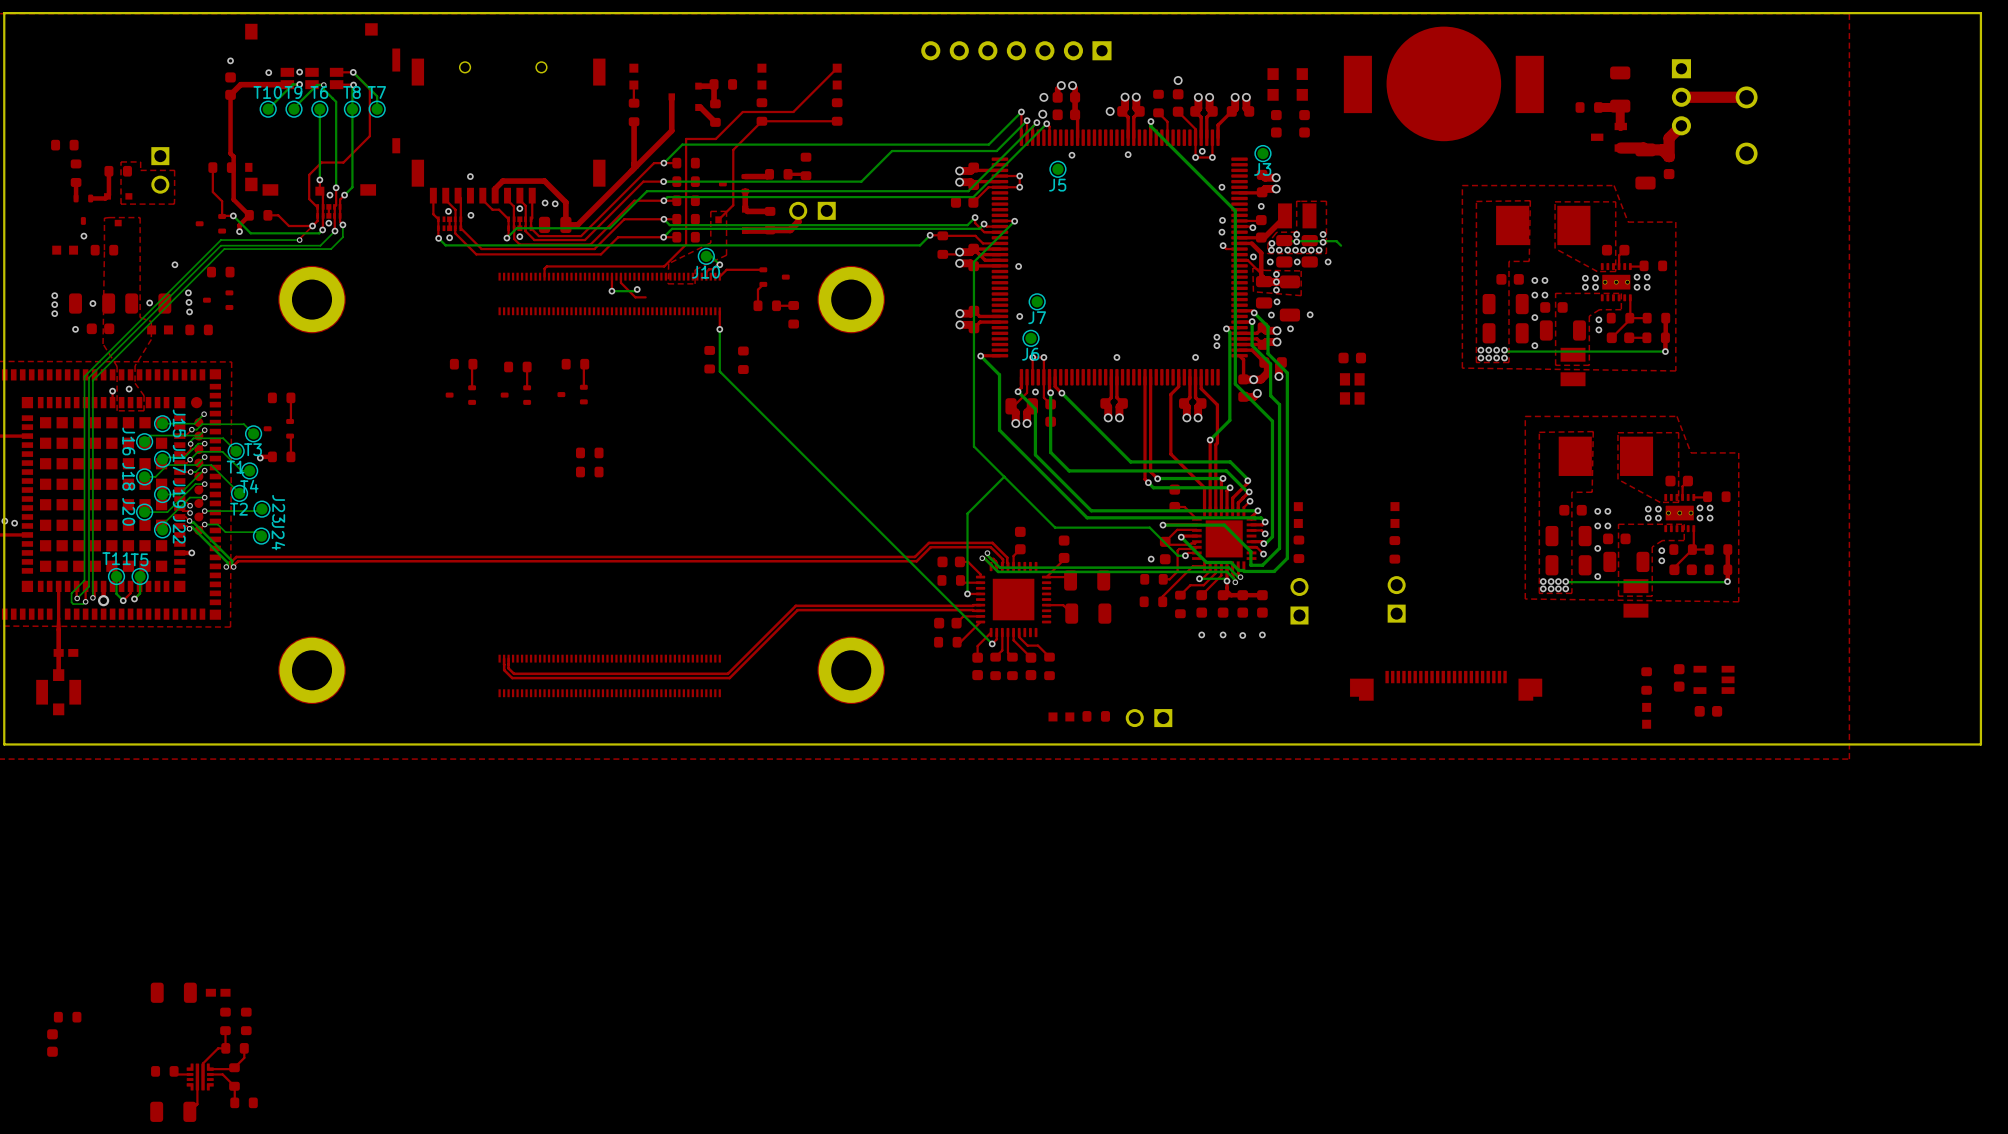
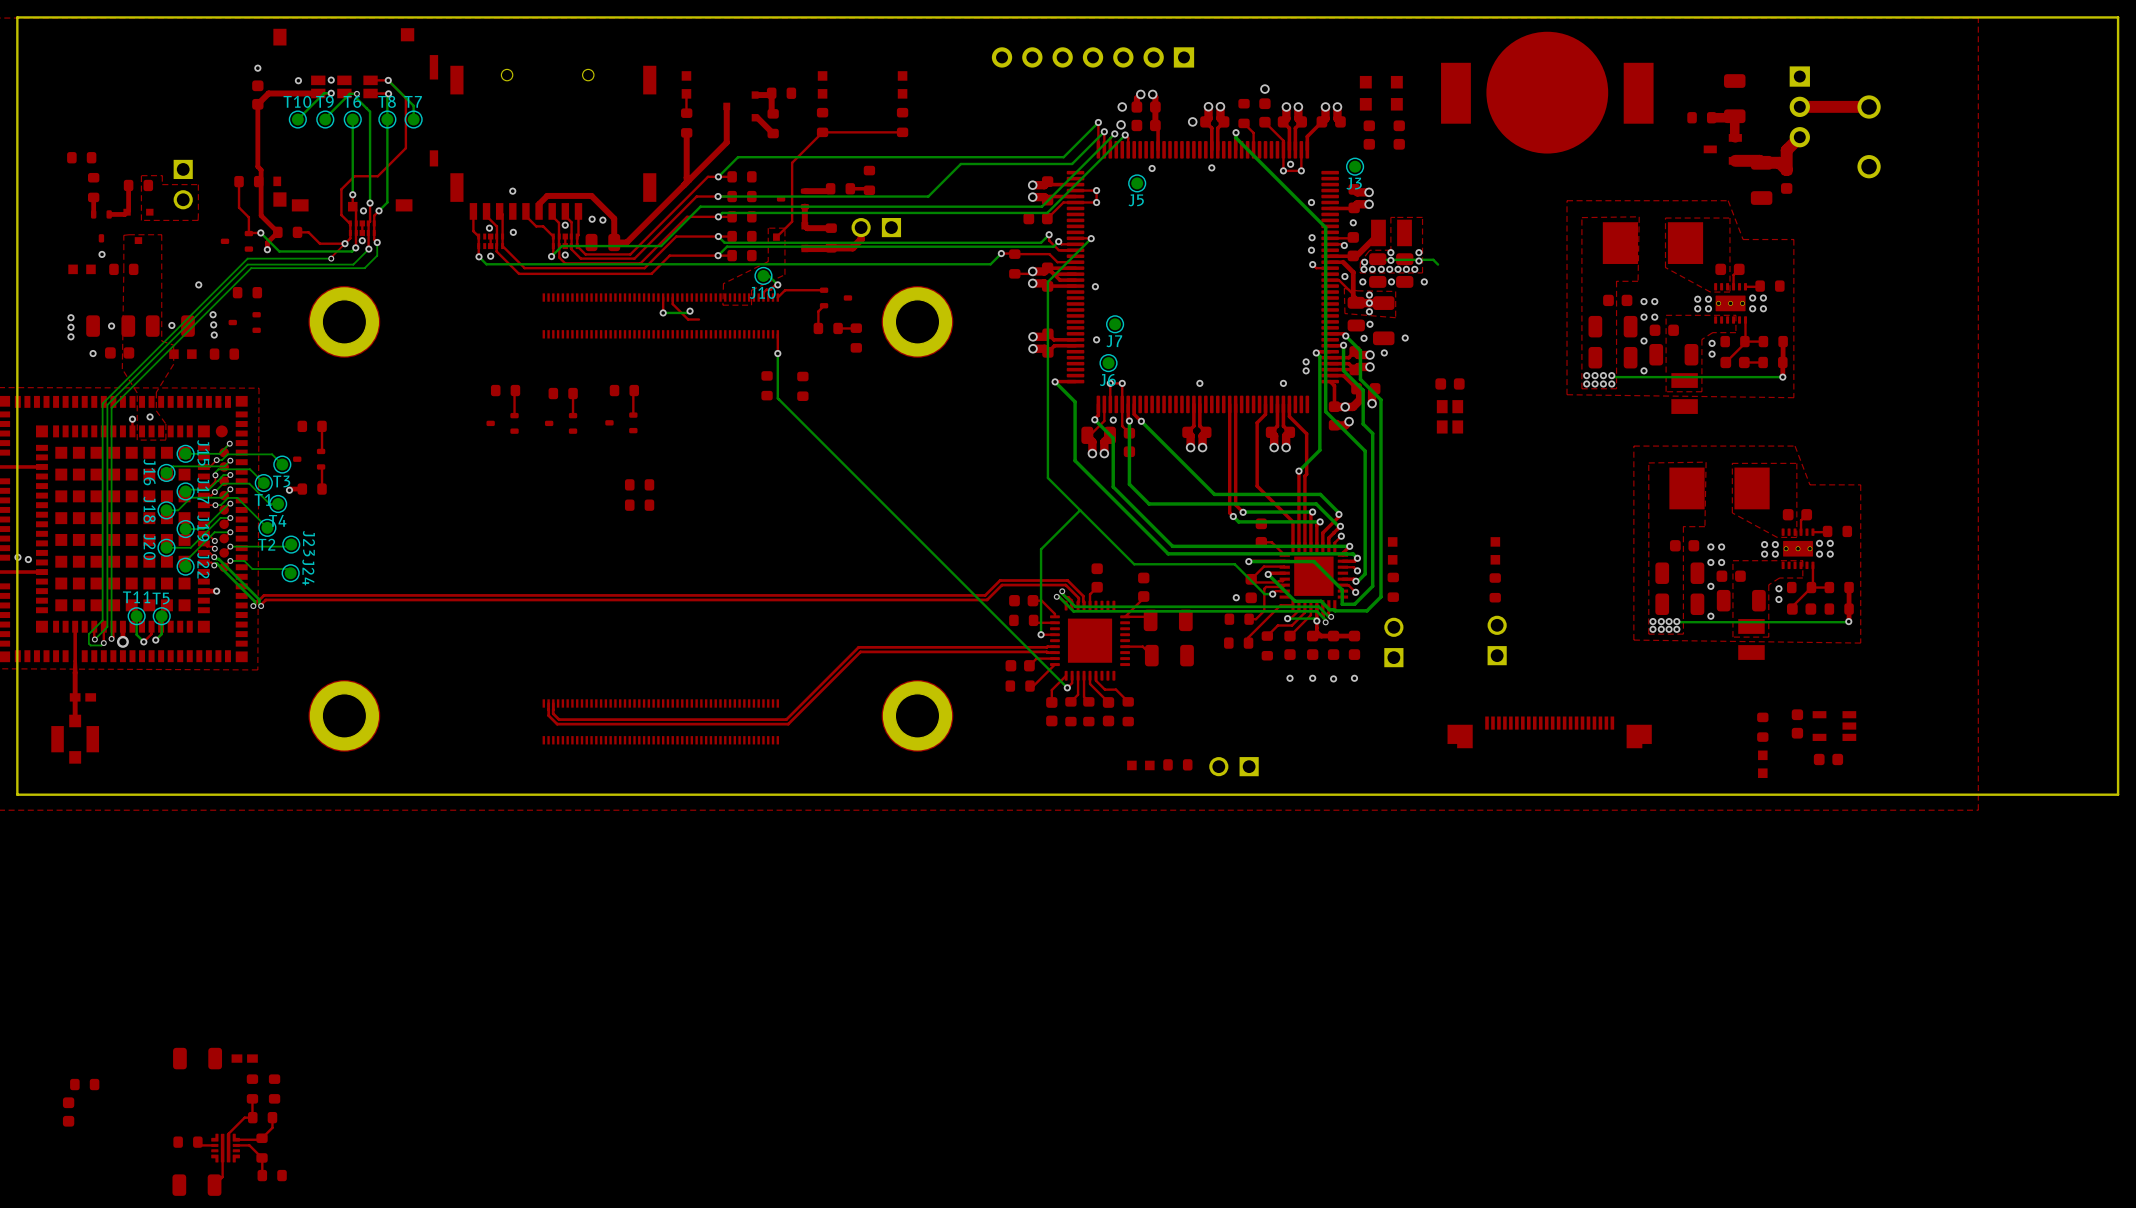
top track: (837, 68) (793, 111) (742, 111) (715, 138) (686, 138) (686, 244) (664, 266) (546, 266) (544, 268) (544, 276) -> none

